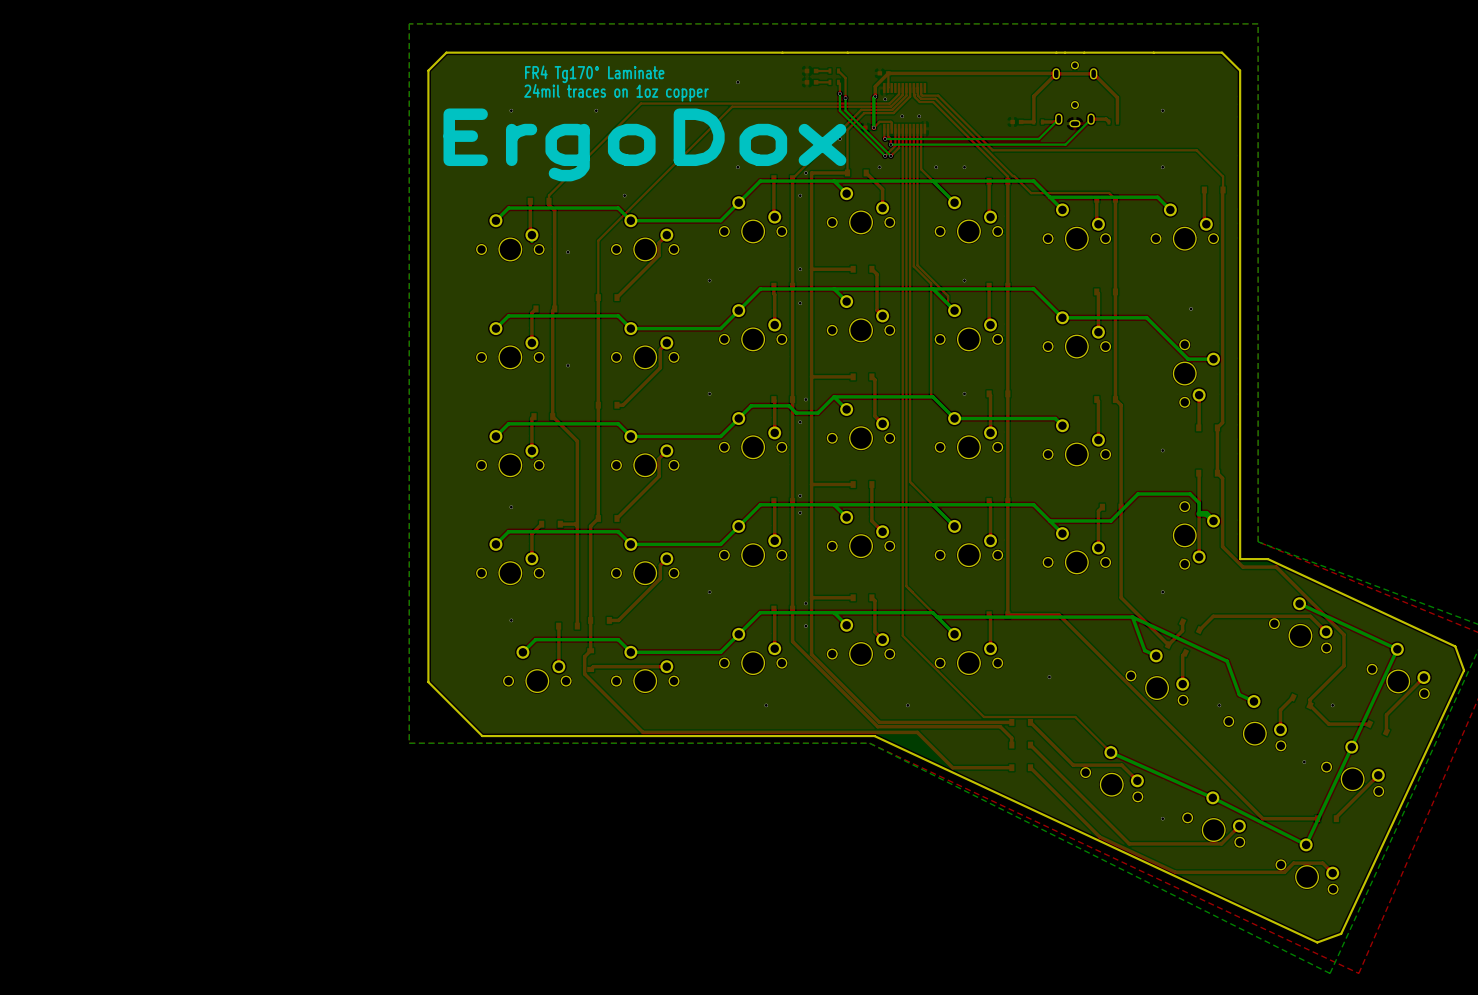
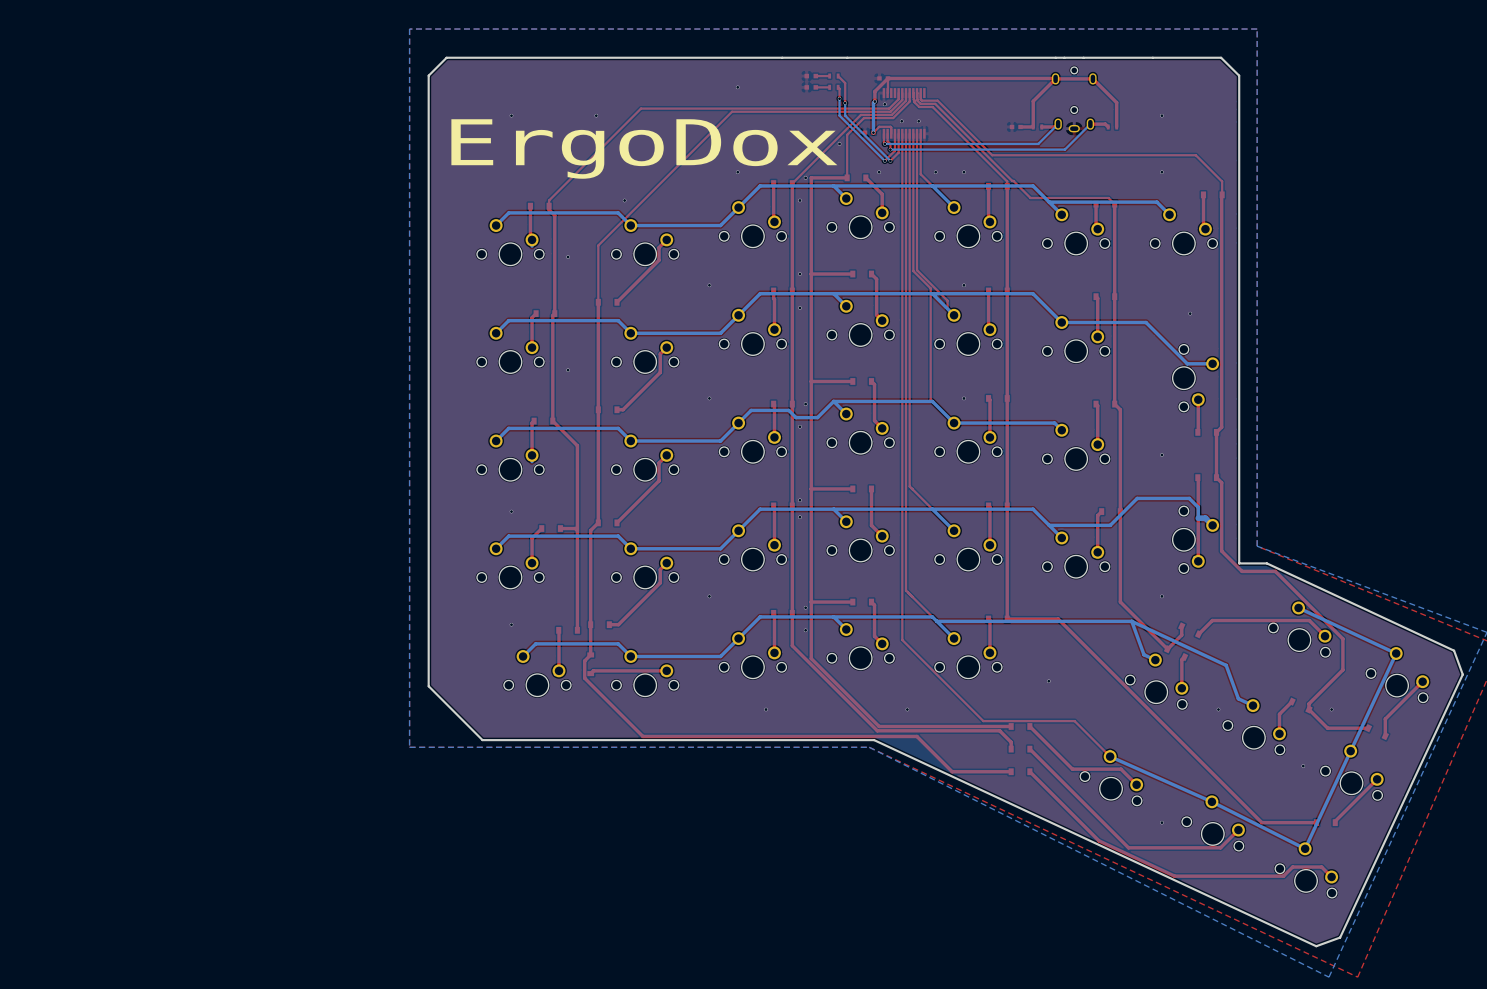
text: FR4 Tg170° Laminate (594, 74) -> none
text: 24mil traces on 1oz copper (616, 92) -> none

